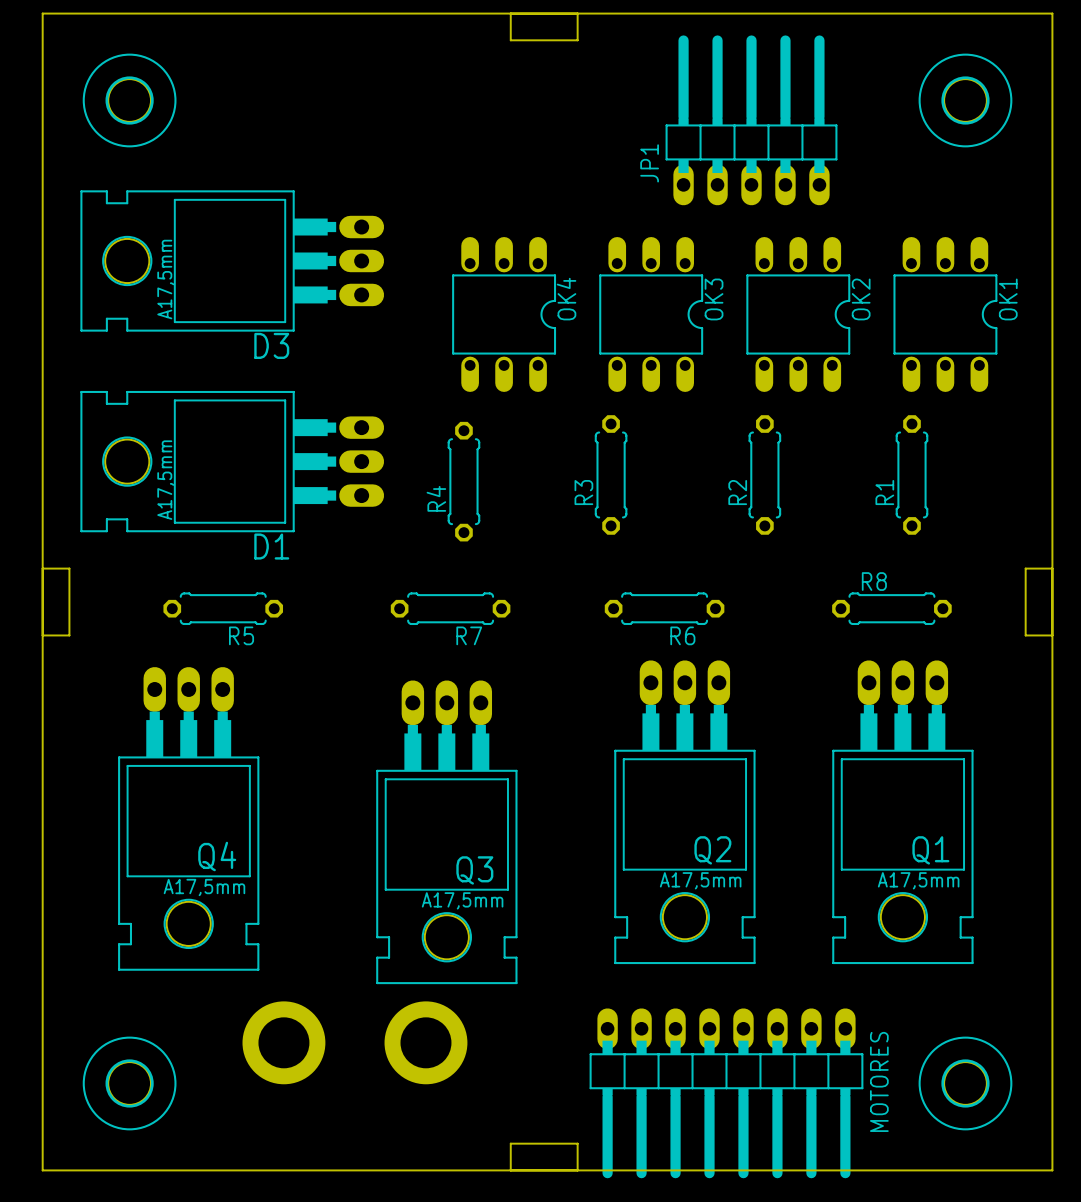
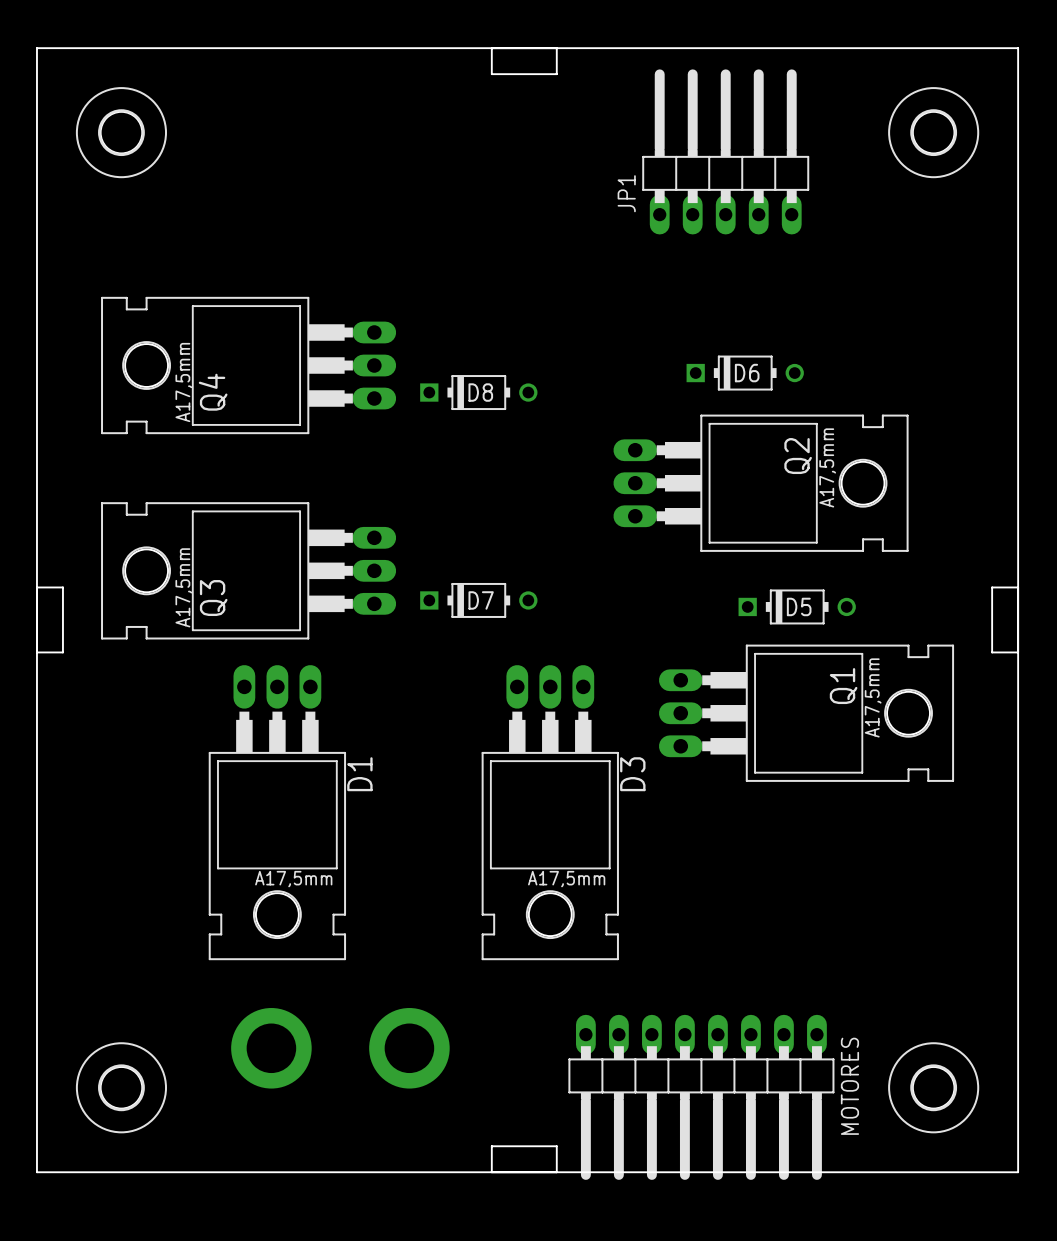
D3 footprint: [80, 190, 385, 332] -> [481, 665, 619, 961]
OK4: (504, 314) -> none
OK3: (651, 314) -> none
OK2: (798, 314) -> none
OK1: (945, 314) -> none
D3 name position: D3 (271, 345) -> D3 (632, 774)
D6: none -> (745, 373)
D8: none -> (478, 392)
D1 footprint: [80, 390, 385, 533] -> [208, 665, 347, 961]
R3: (611, 474) -> none
R2: (764, 474) -> none
R1: (911, 474) -> none
R4: (463, 481) -> none
D1 name position: D1 (271, 546) -> D1 (359, 774)
D7: none -> (478, 600)
D5: none -> (797, 606)
R5: (223, 608) -> none
R7: (450, 608) -> none
R6: (664, 608) -> none
R8: (891, 608) -> none
Q4 footprint: [118, 667, 260, 971] -> [101, 296, 397, 435]
Q3 footprint: [376, 680, 518, 985] -> [101, 502, 397, 640]
Q2 rotation: 0° (684, 812) -> 90° counterclockwise (761, 483)
Q2 position: (684, 812) -> (761, 483)
Q1 rotation: 0° (902, 812) -> 90° counterclockwise (806, 713)
Q4 name position: Q4 (217, 856) -> Q4 (213, 392)
Q3 name position: Q3 (474, 870) -> Q3 (213, 598)

